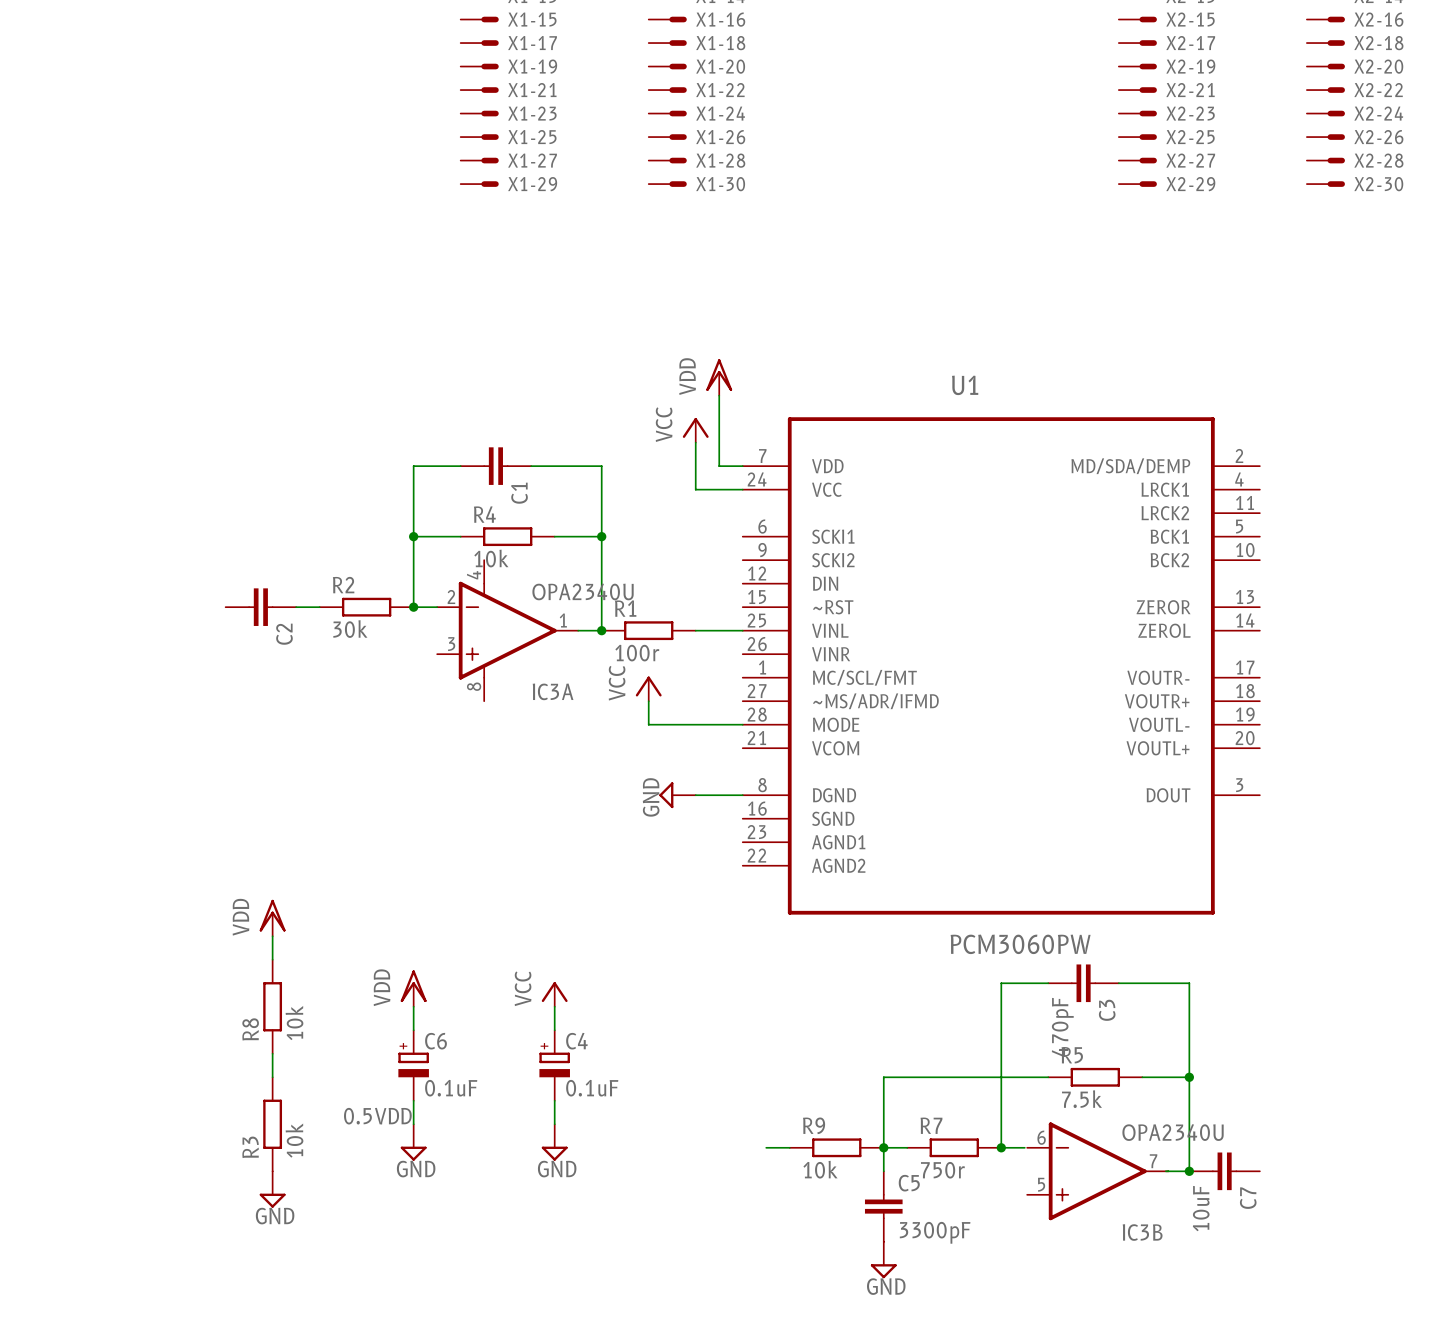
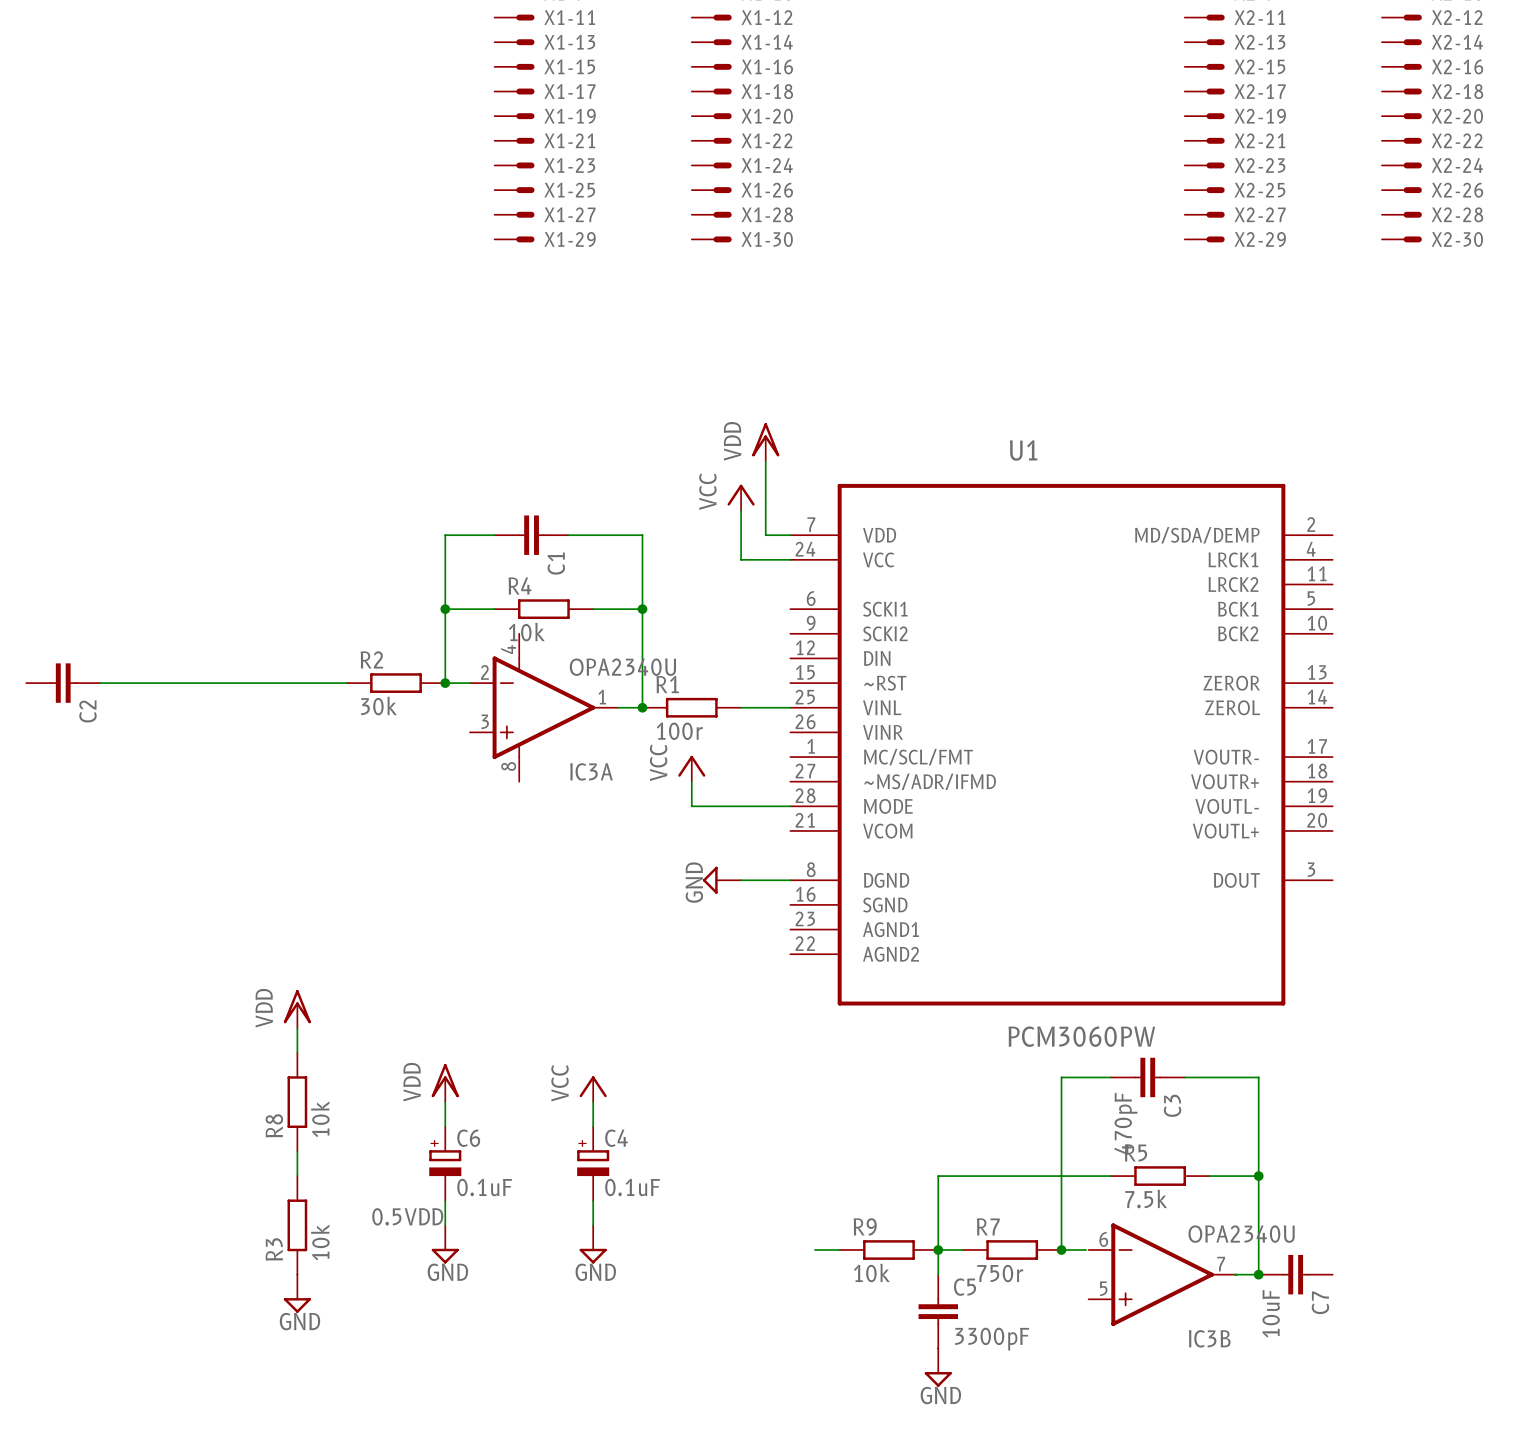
wire: none -> (100, 683) (322, 683)
C2 position: (260, 607) -> (63, 683)

